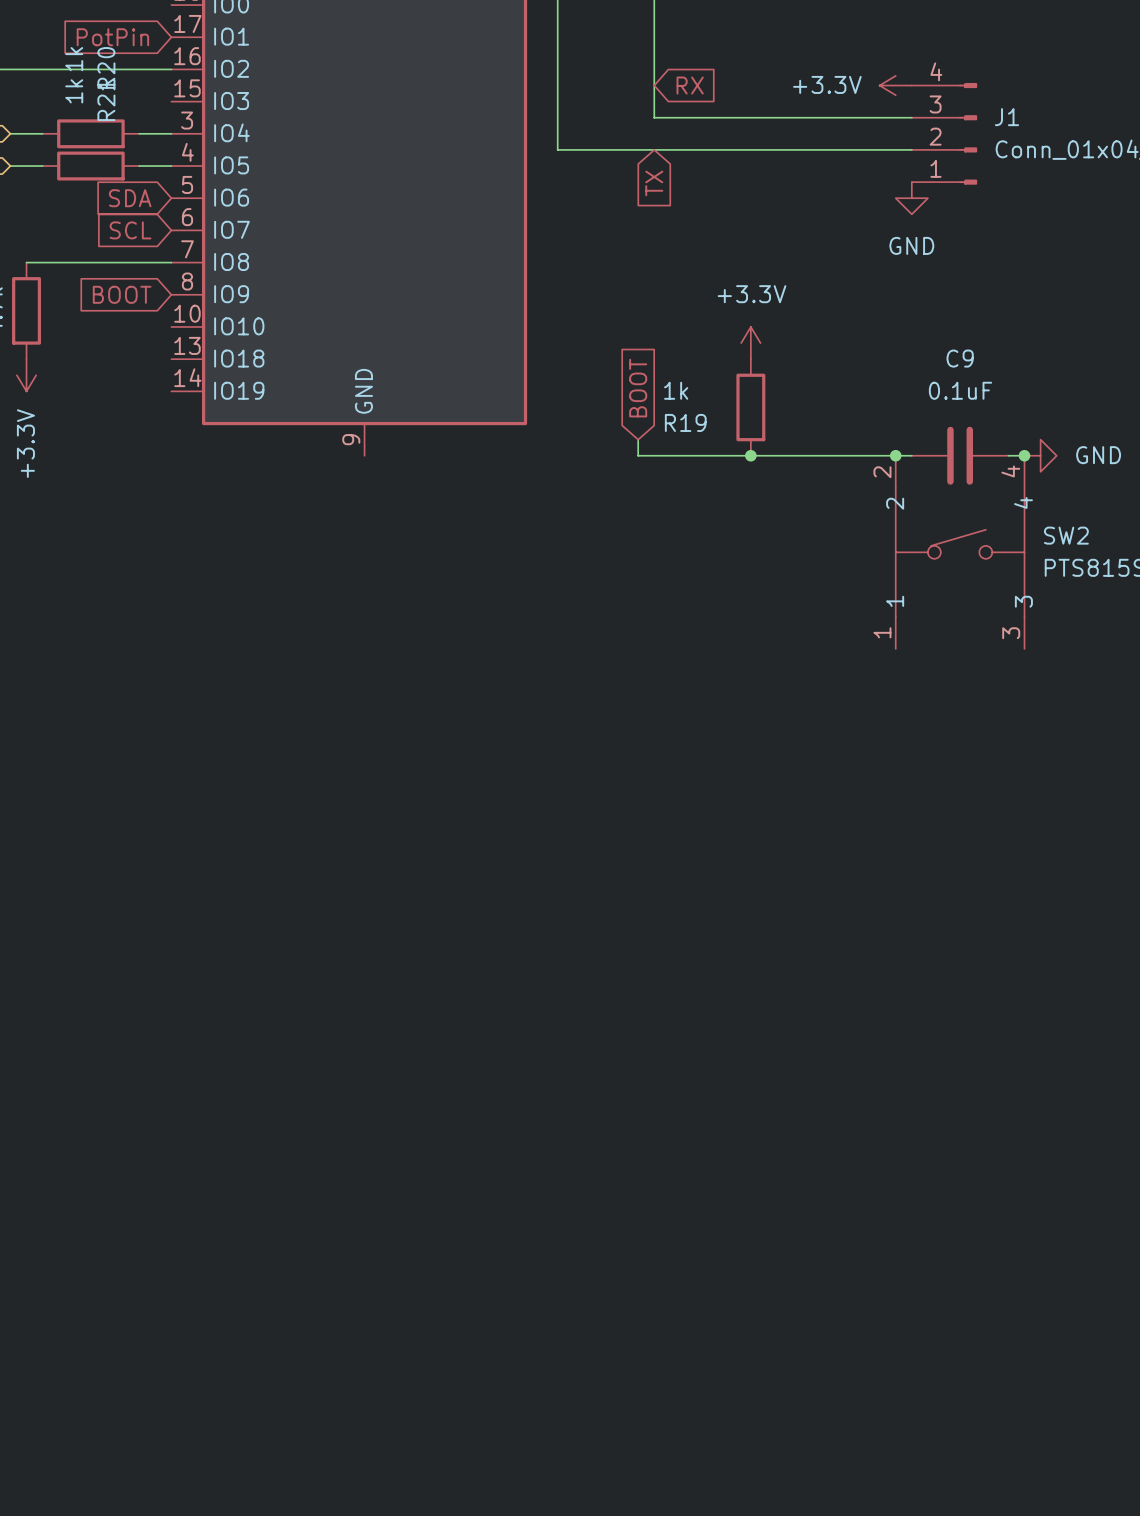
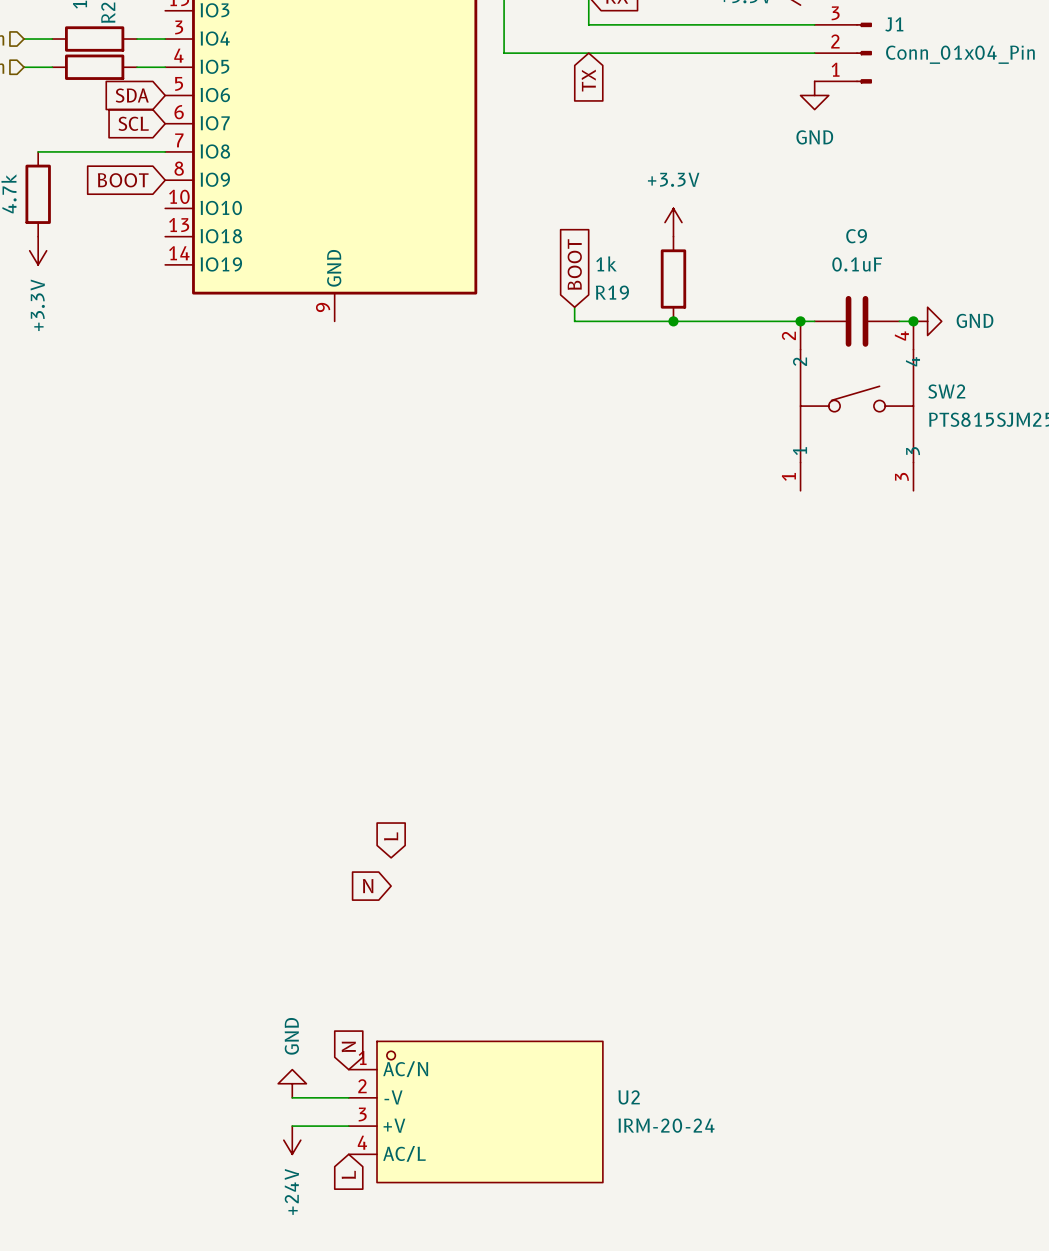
global label: none -> L (391, 836)
global label: none -> N (368, 886)
global label: none -> N (348, 1046)
power symbol: none -> GND (292, 1083)
wire: none -> (292, 1097) (348, 1097)
U2: none -> IRM-20-24 (475, 1111)
wire: none -> (292, 1126) (348, 1126)
power symbol: none -> +24V (292, 1140)
global label: none -> L (348, 1174)

